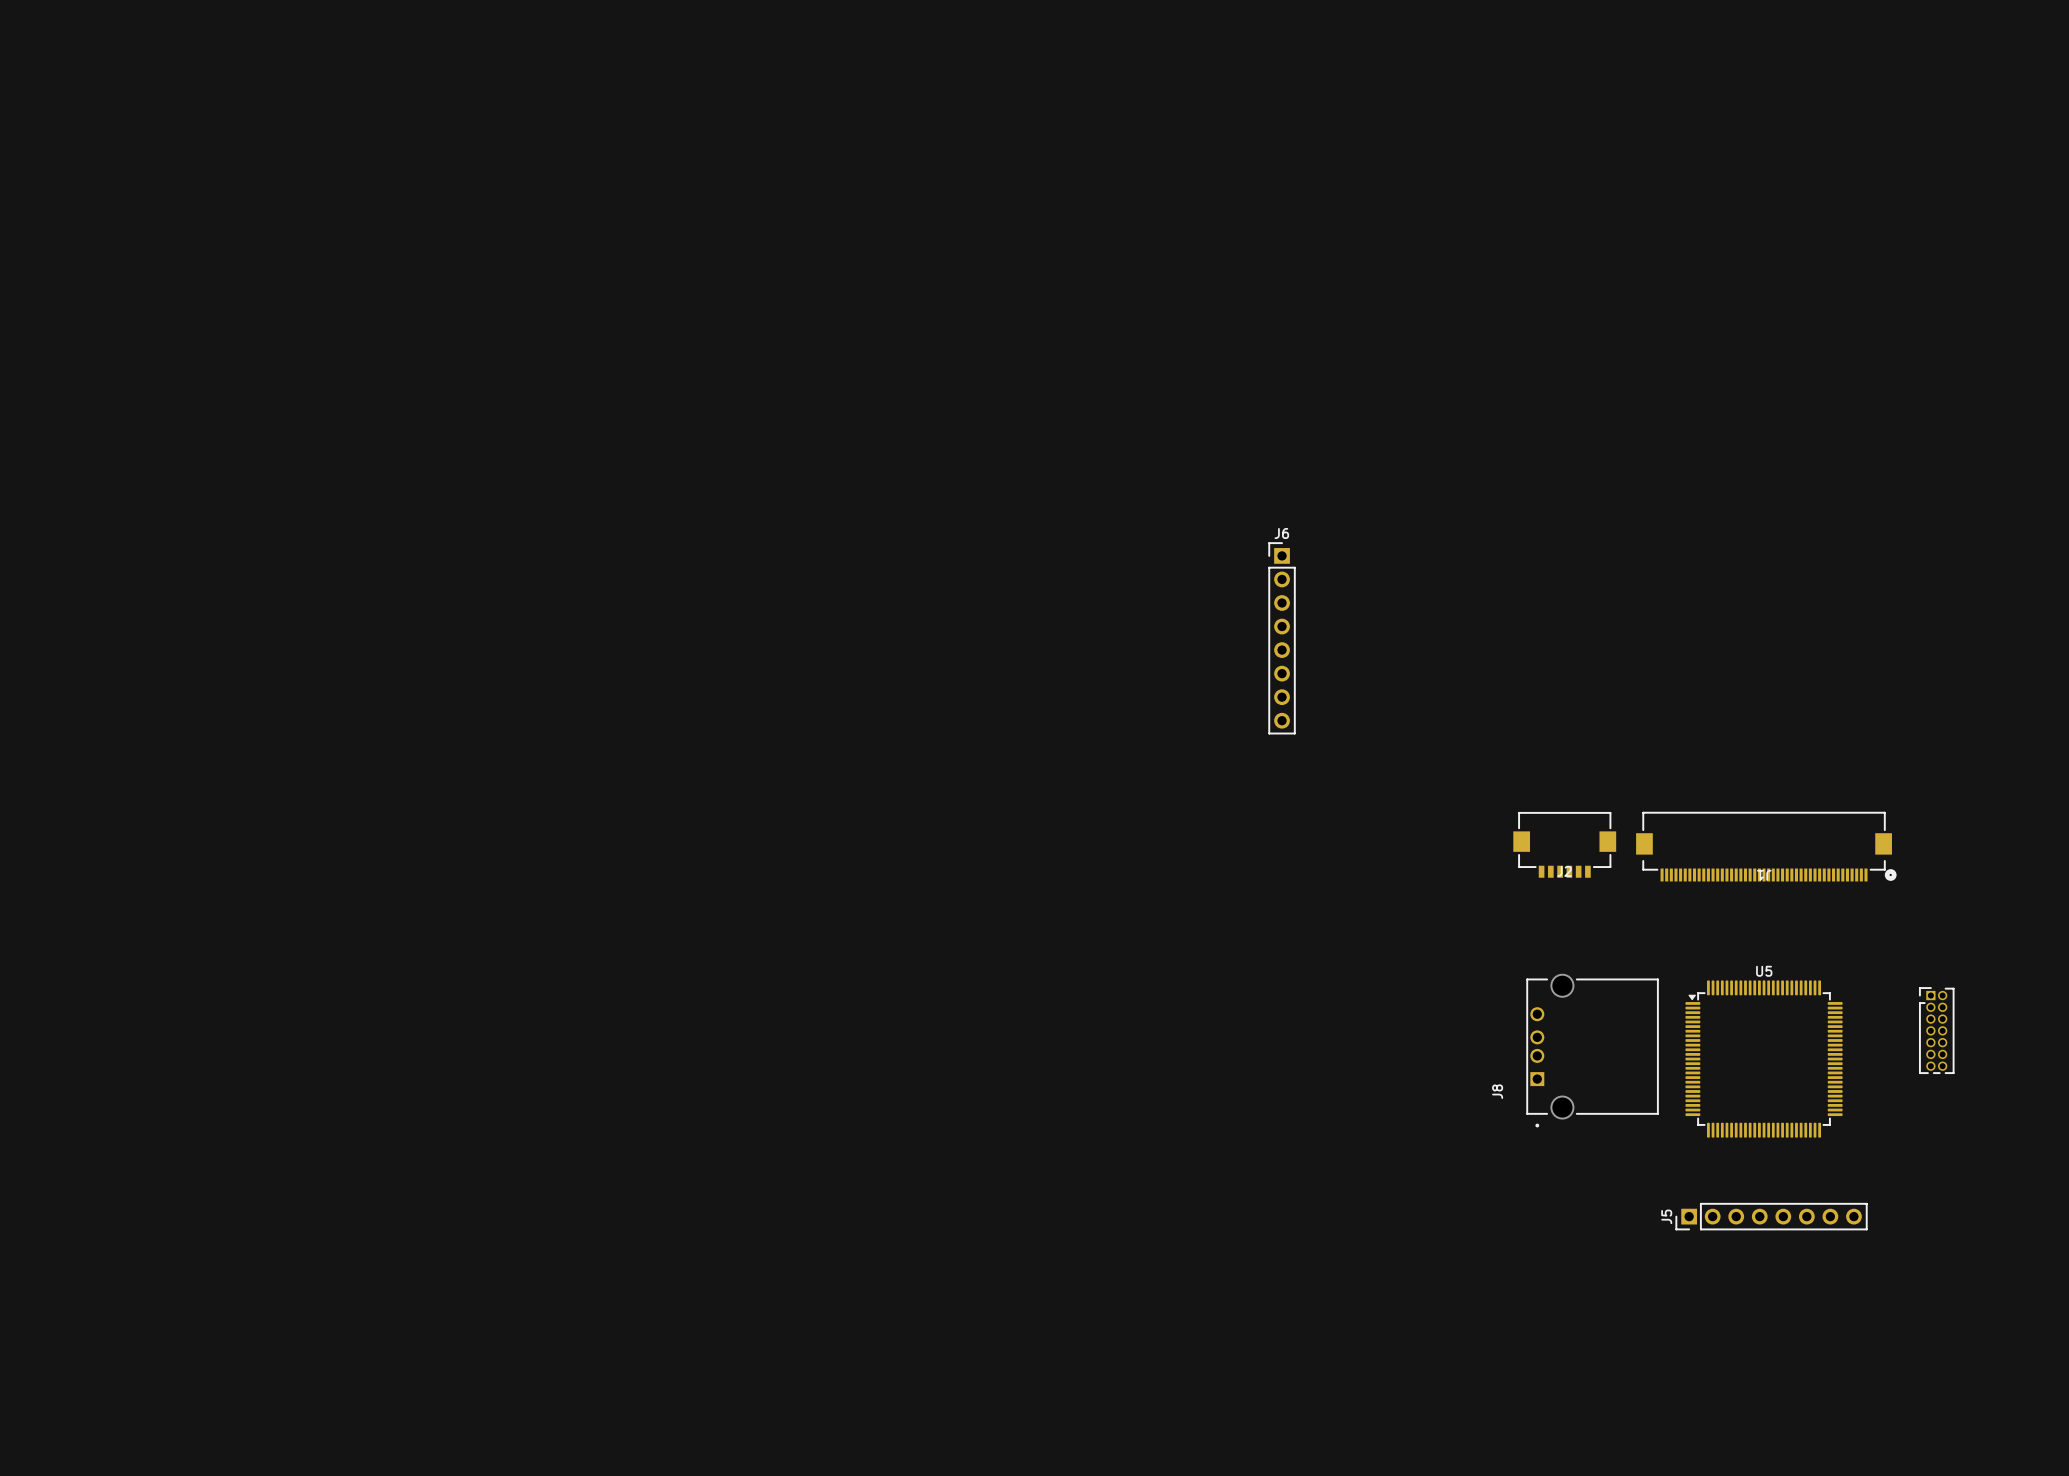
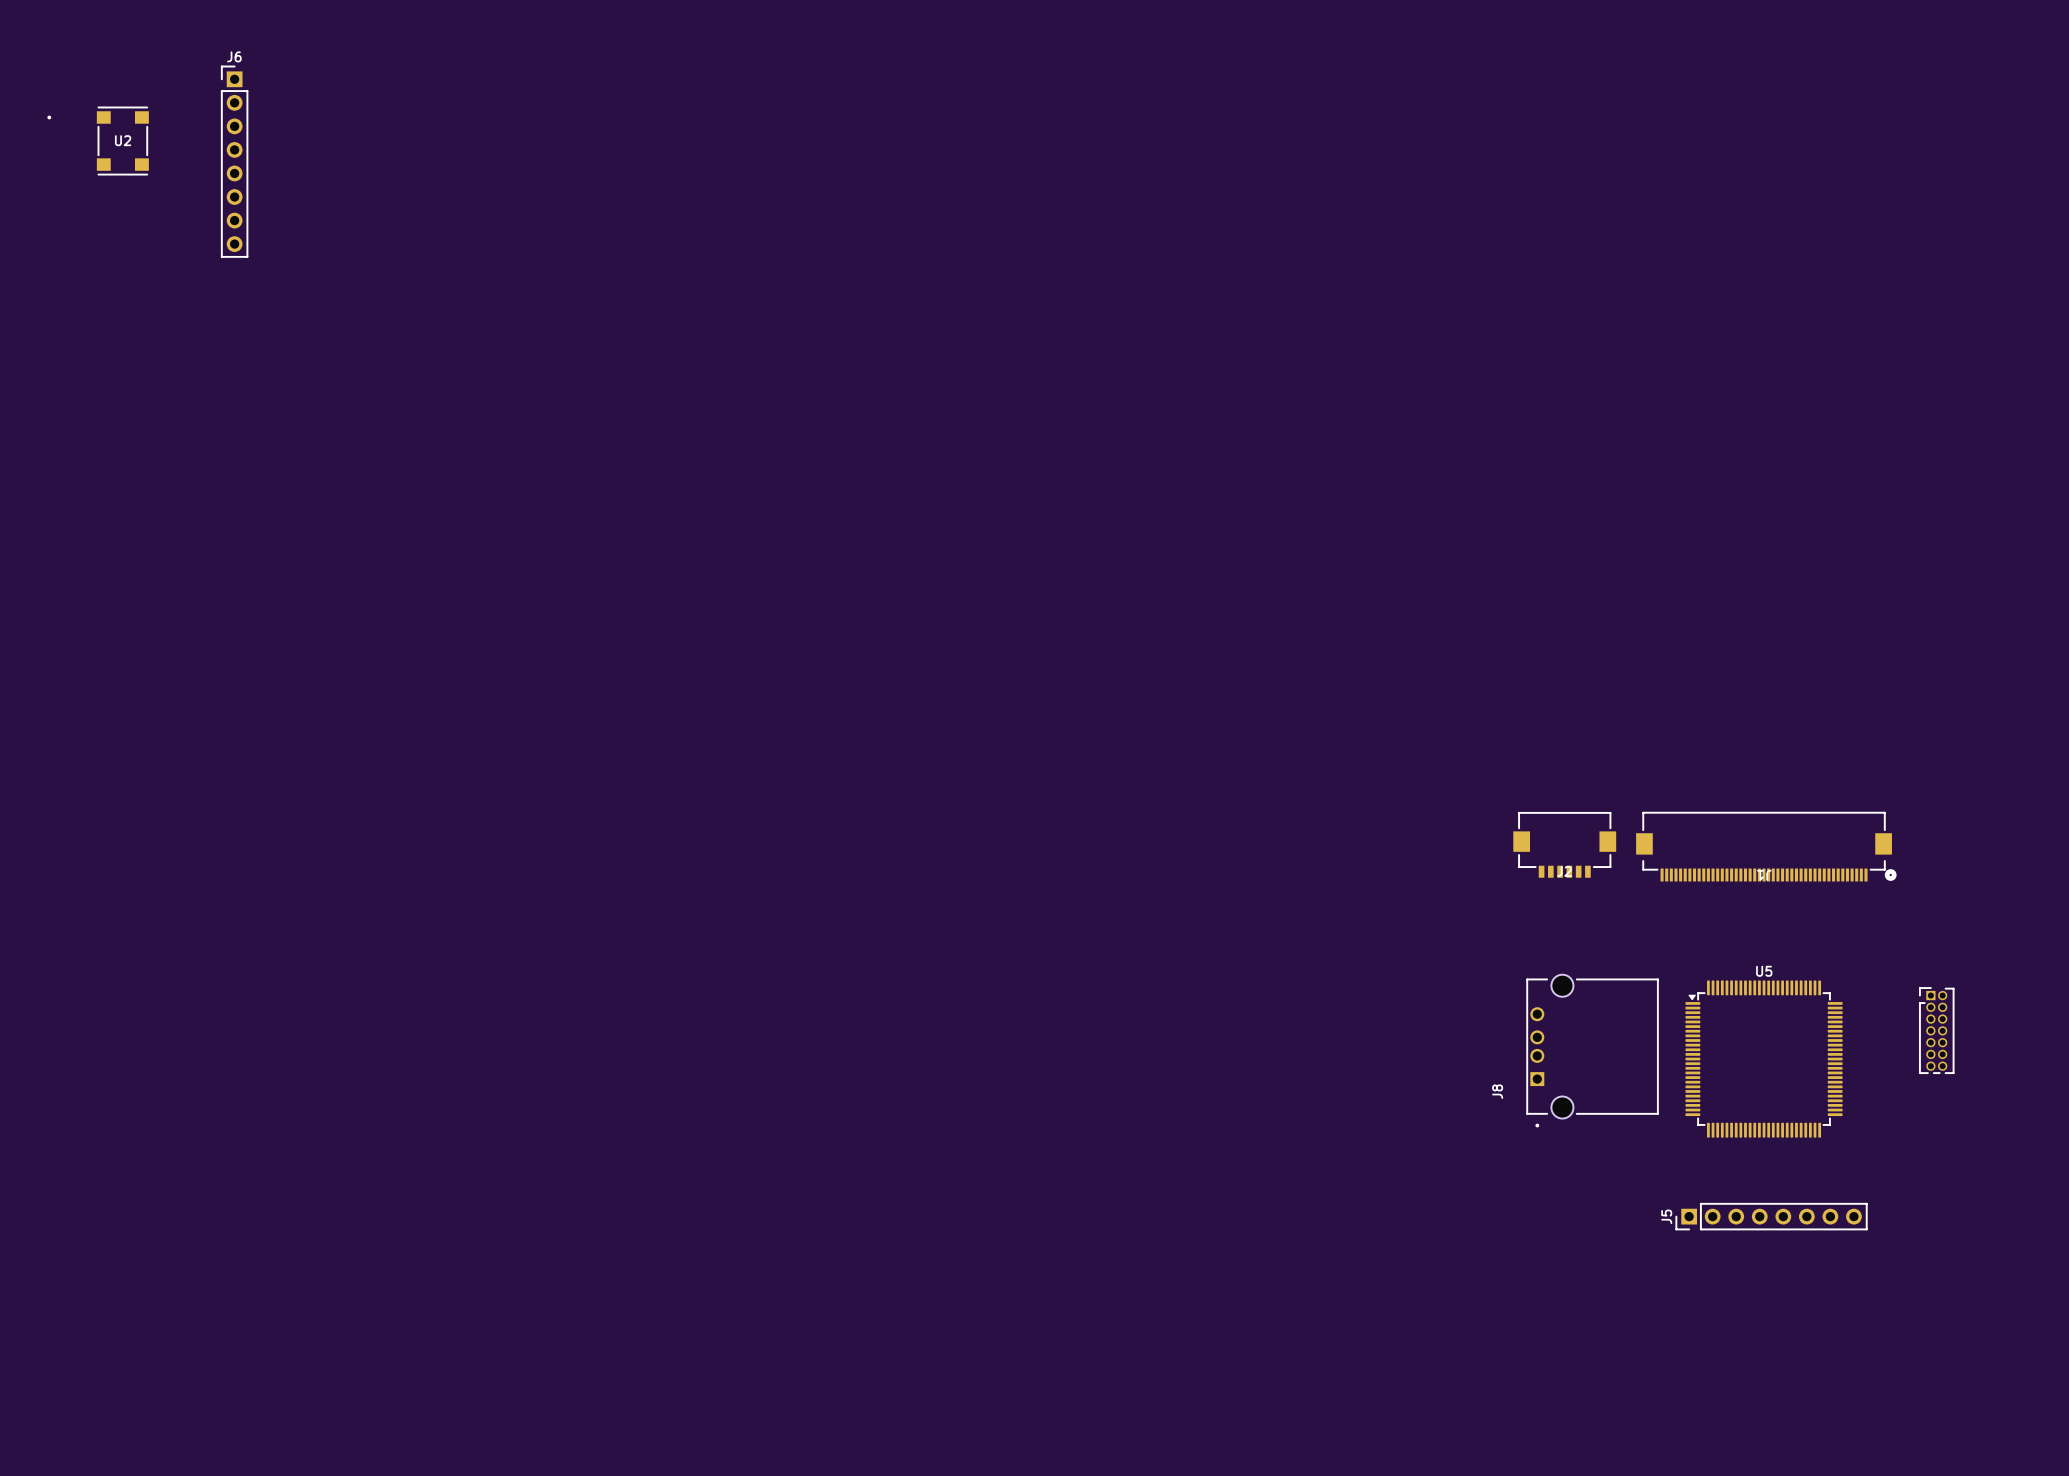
U2: none -> (98, 141)
J6 position: (1282, 638) -> (234, 161)

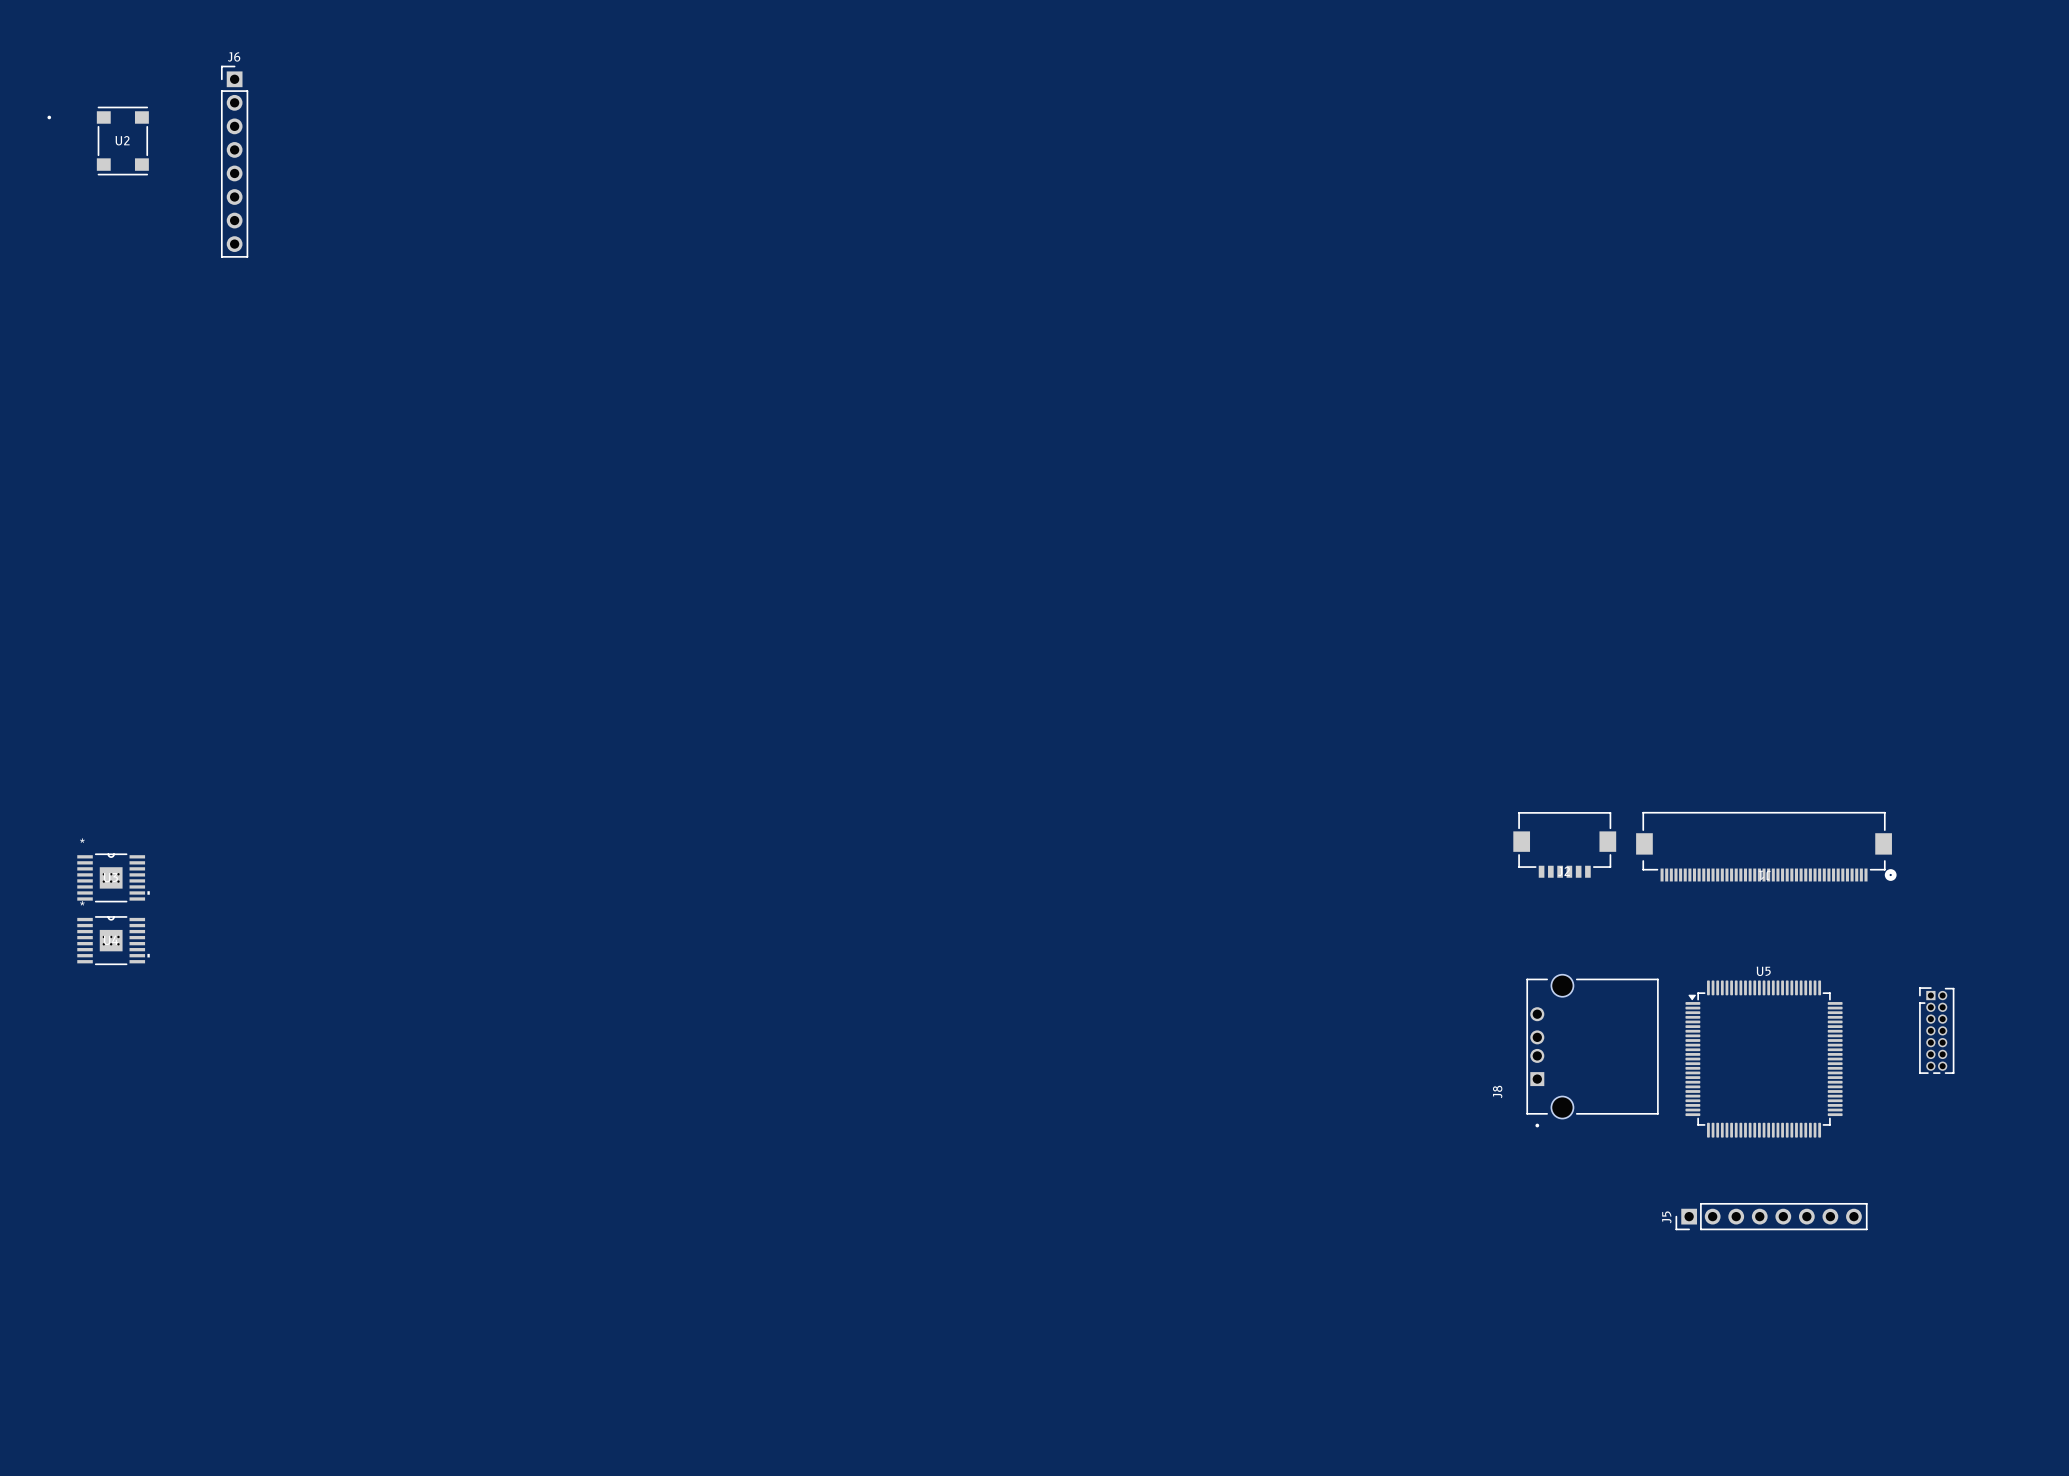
part: none -> (113, 877)
part: none -> (113, 940)

